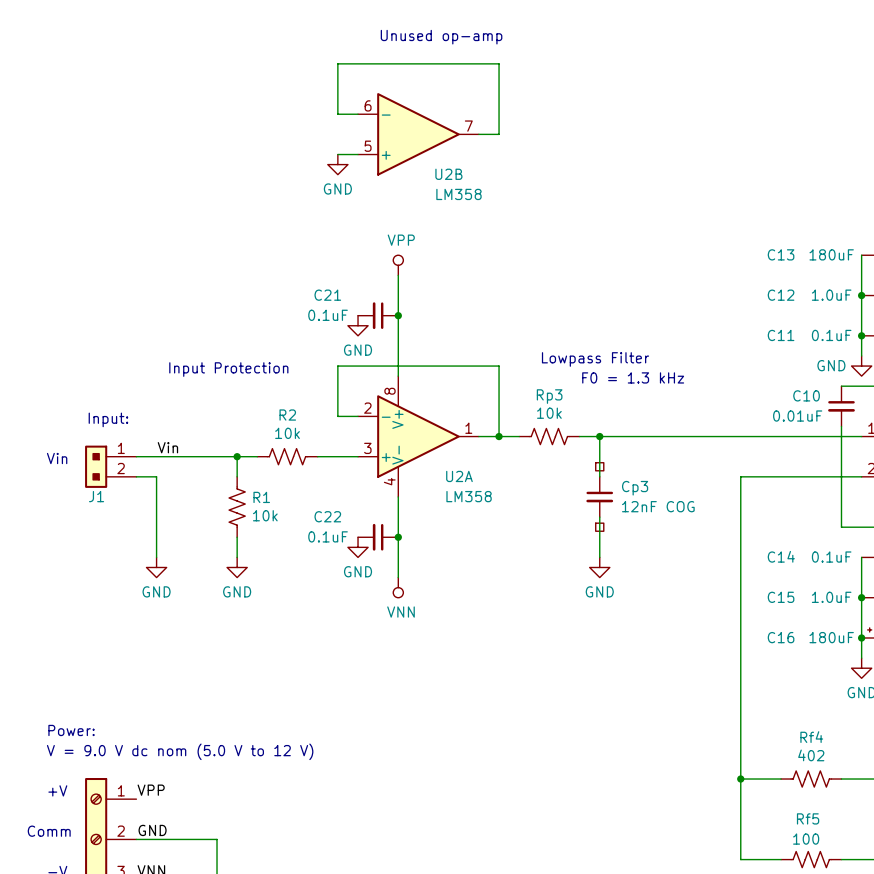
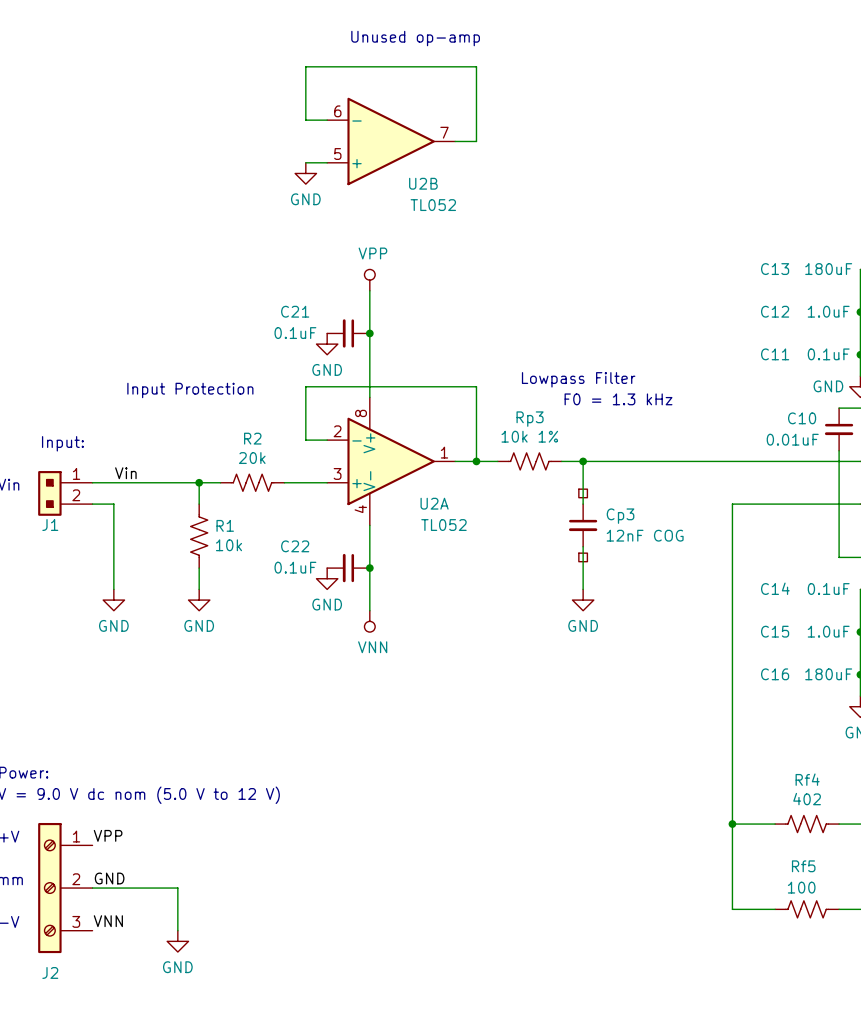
U2B value: LM358 (458, 194) -> TL052 (433, 205)
Rp3 value: 10k (549, 413) -> 10k 1% (529, 436)
R2 value: 10k (287, 433) -> 20k (252, 458)
U2A value: LM358 (469, 496) -> TL052 (443, 525)

